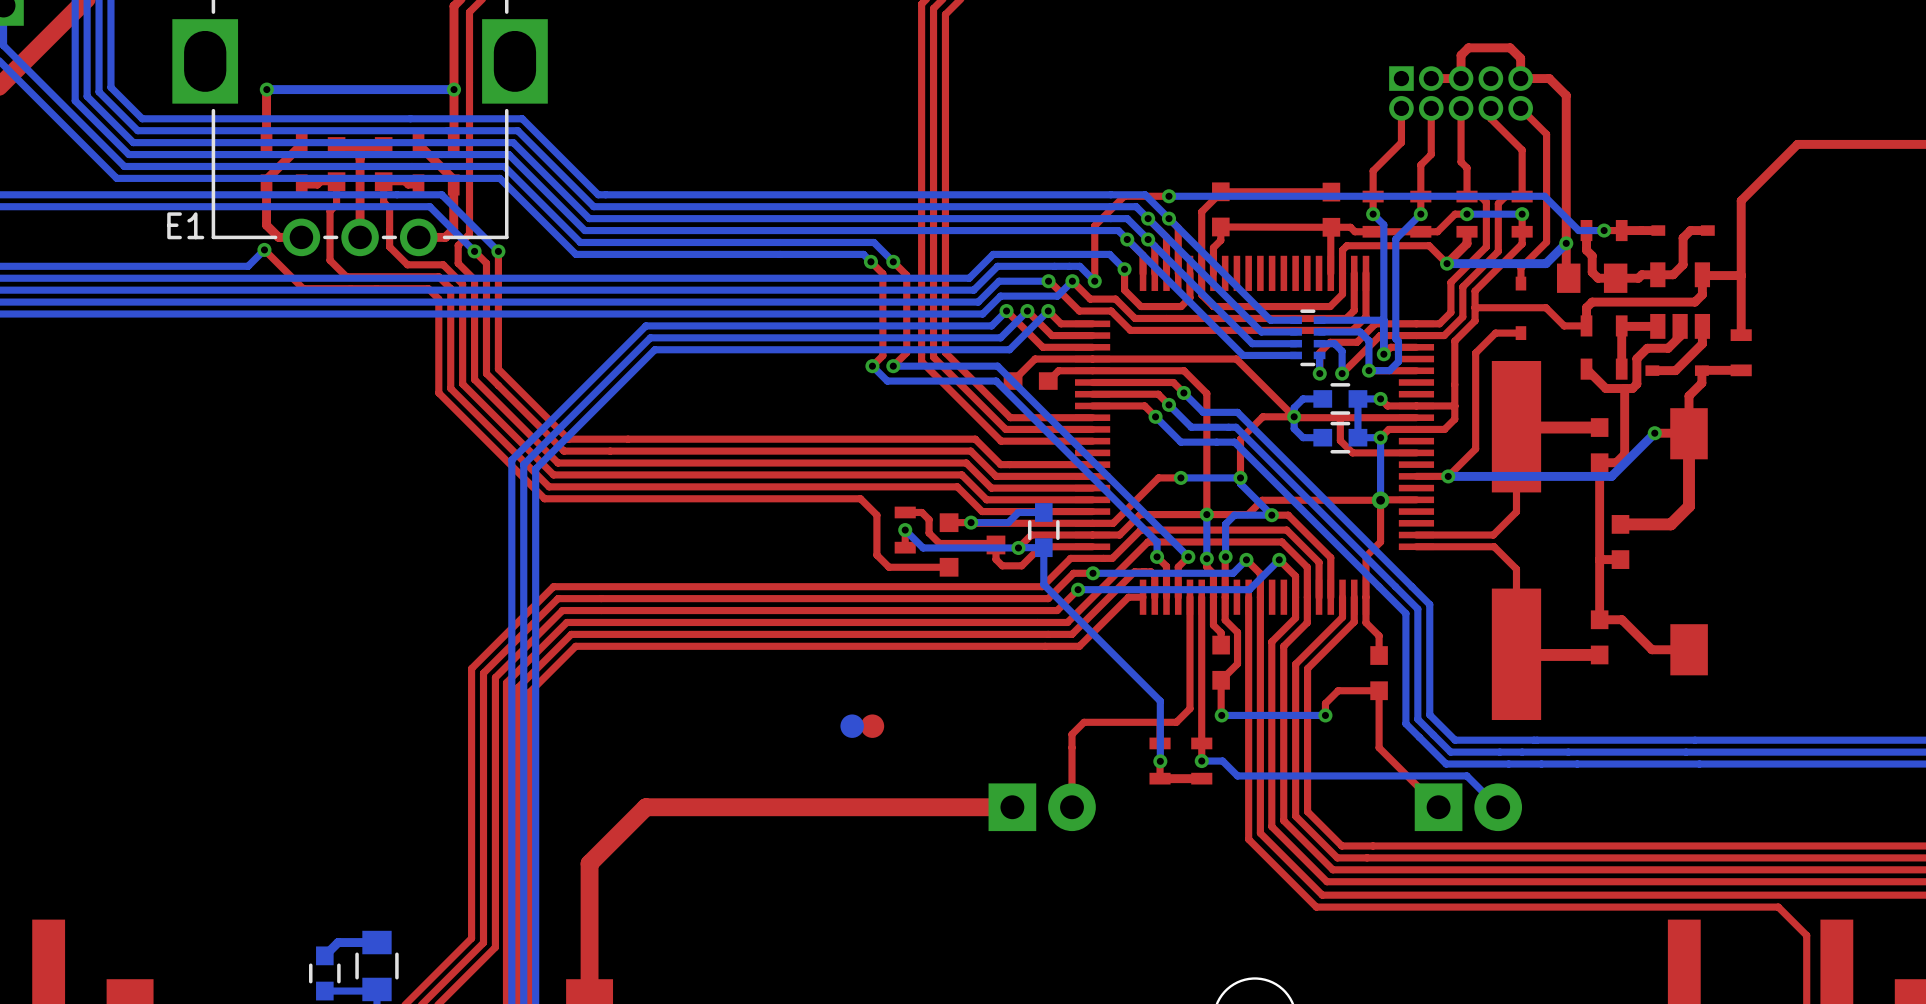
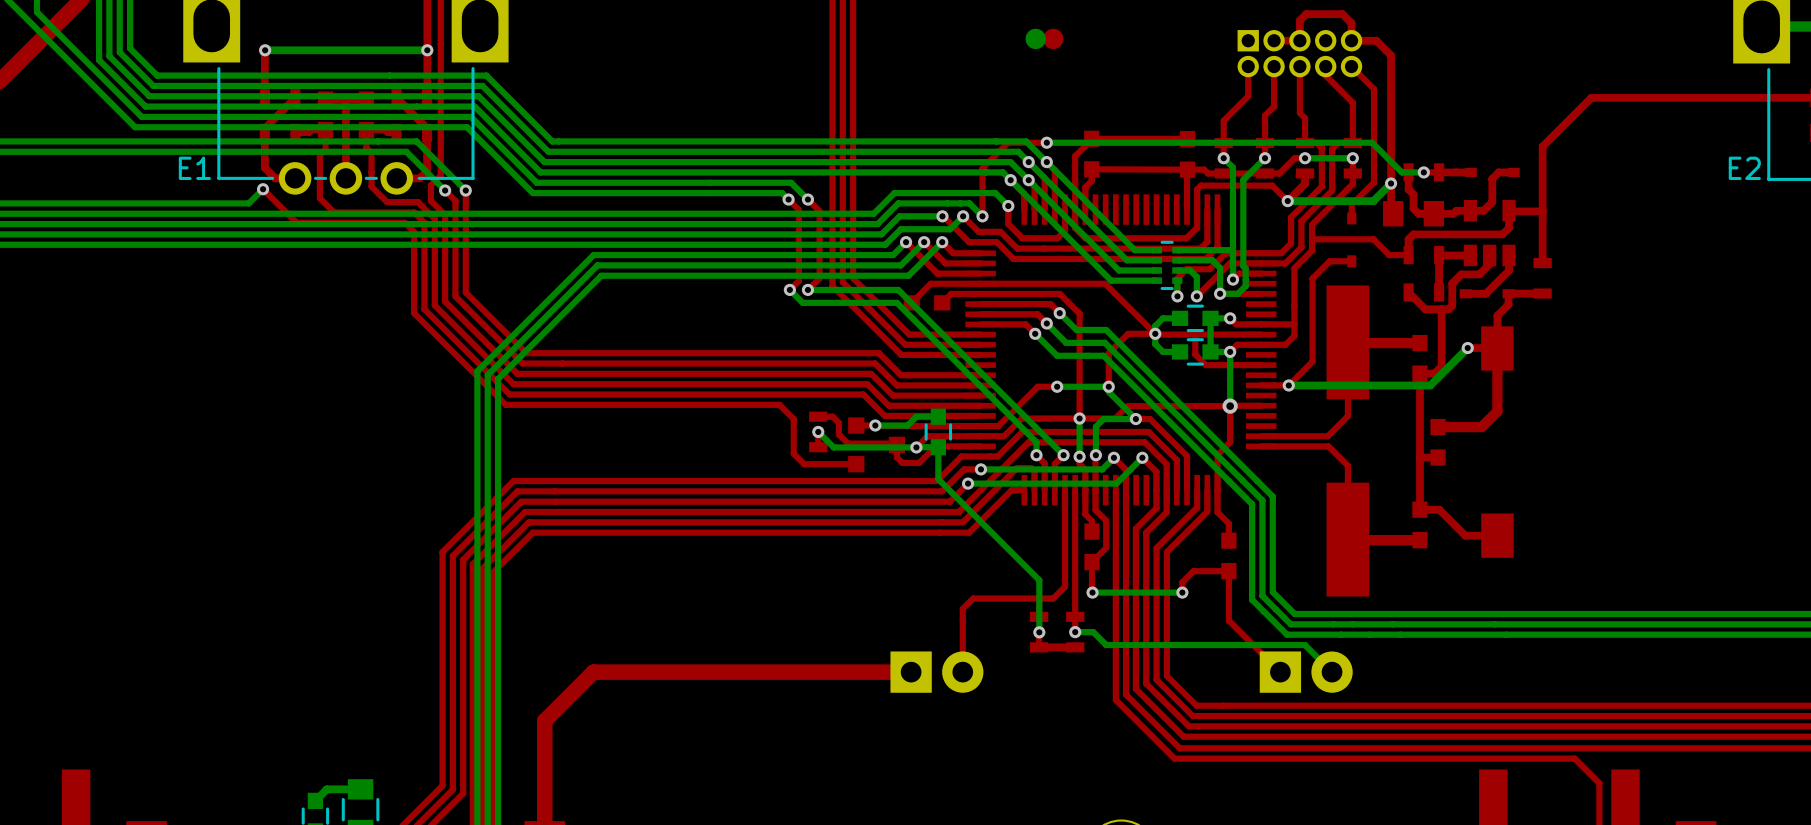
part: none -> (1035, 38)
part: none -> (1053, 38)
part: (852, 726) -> none
part: (872, 726) -> none

